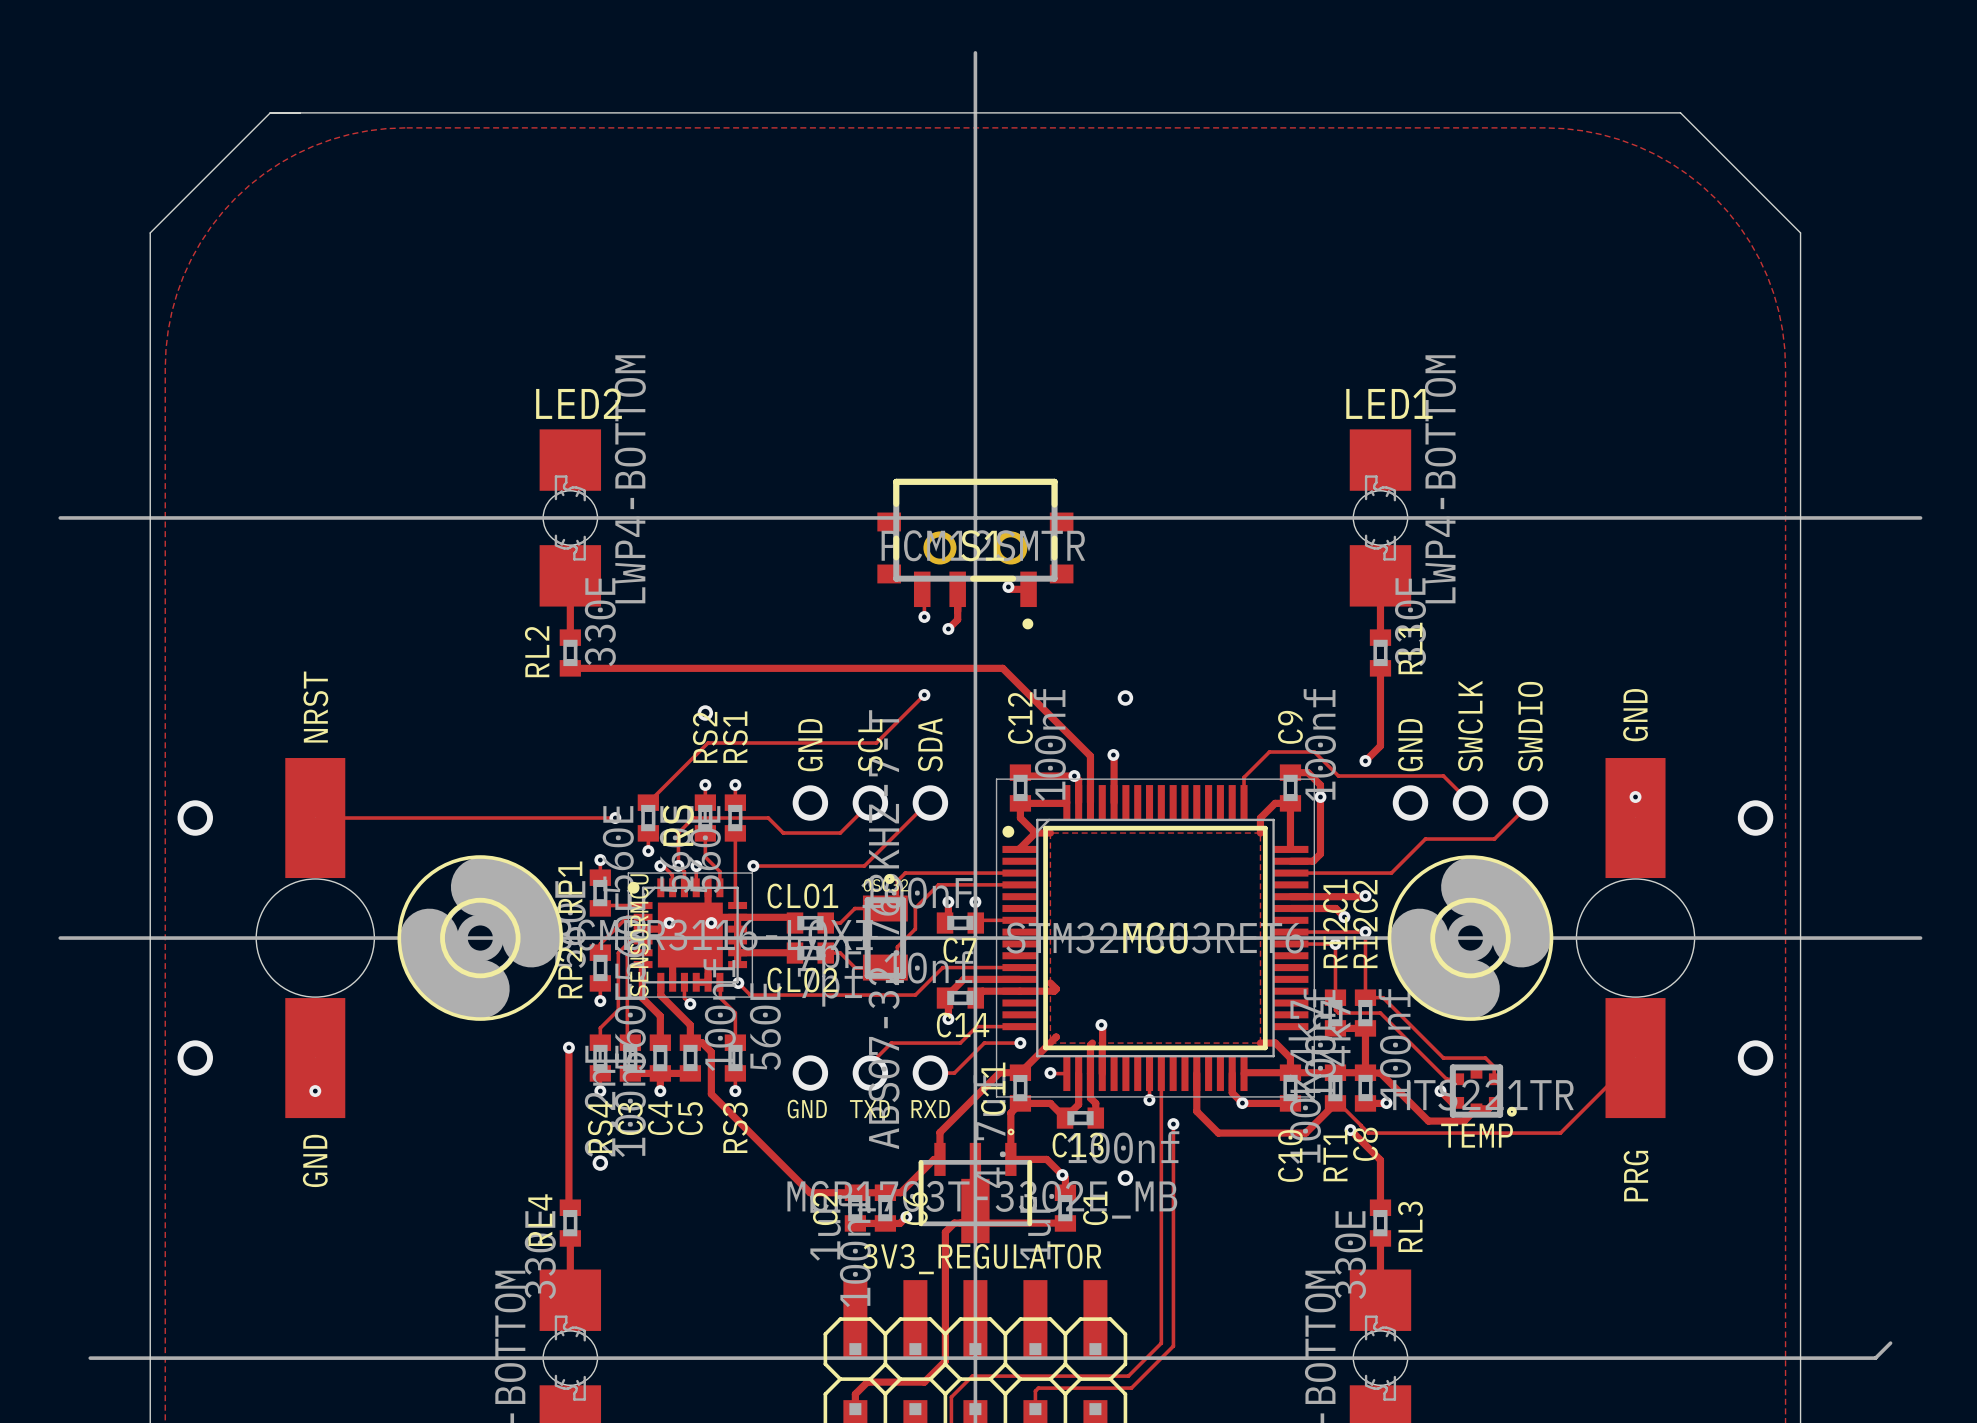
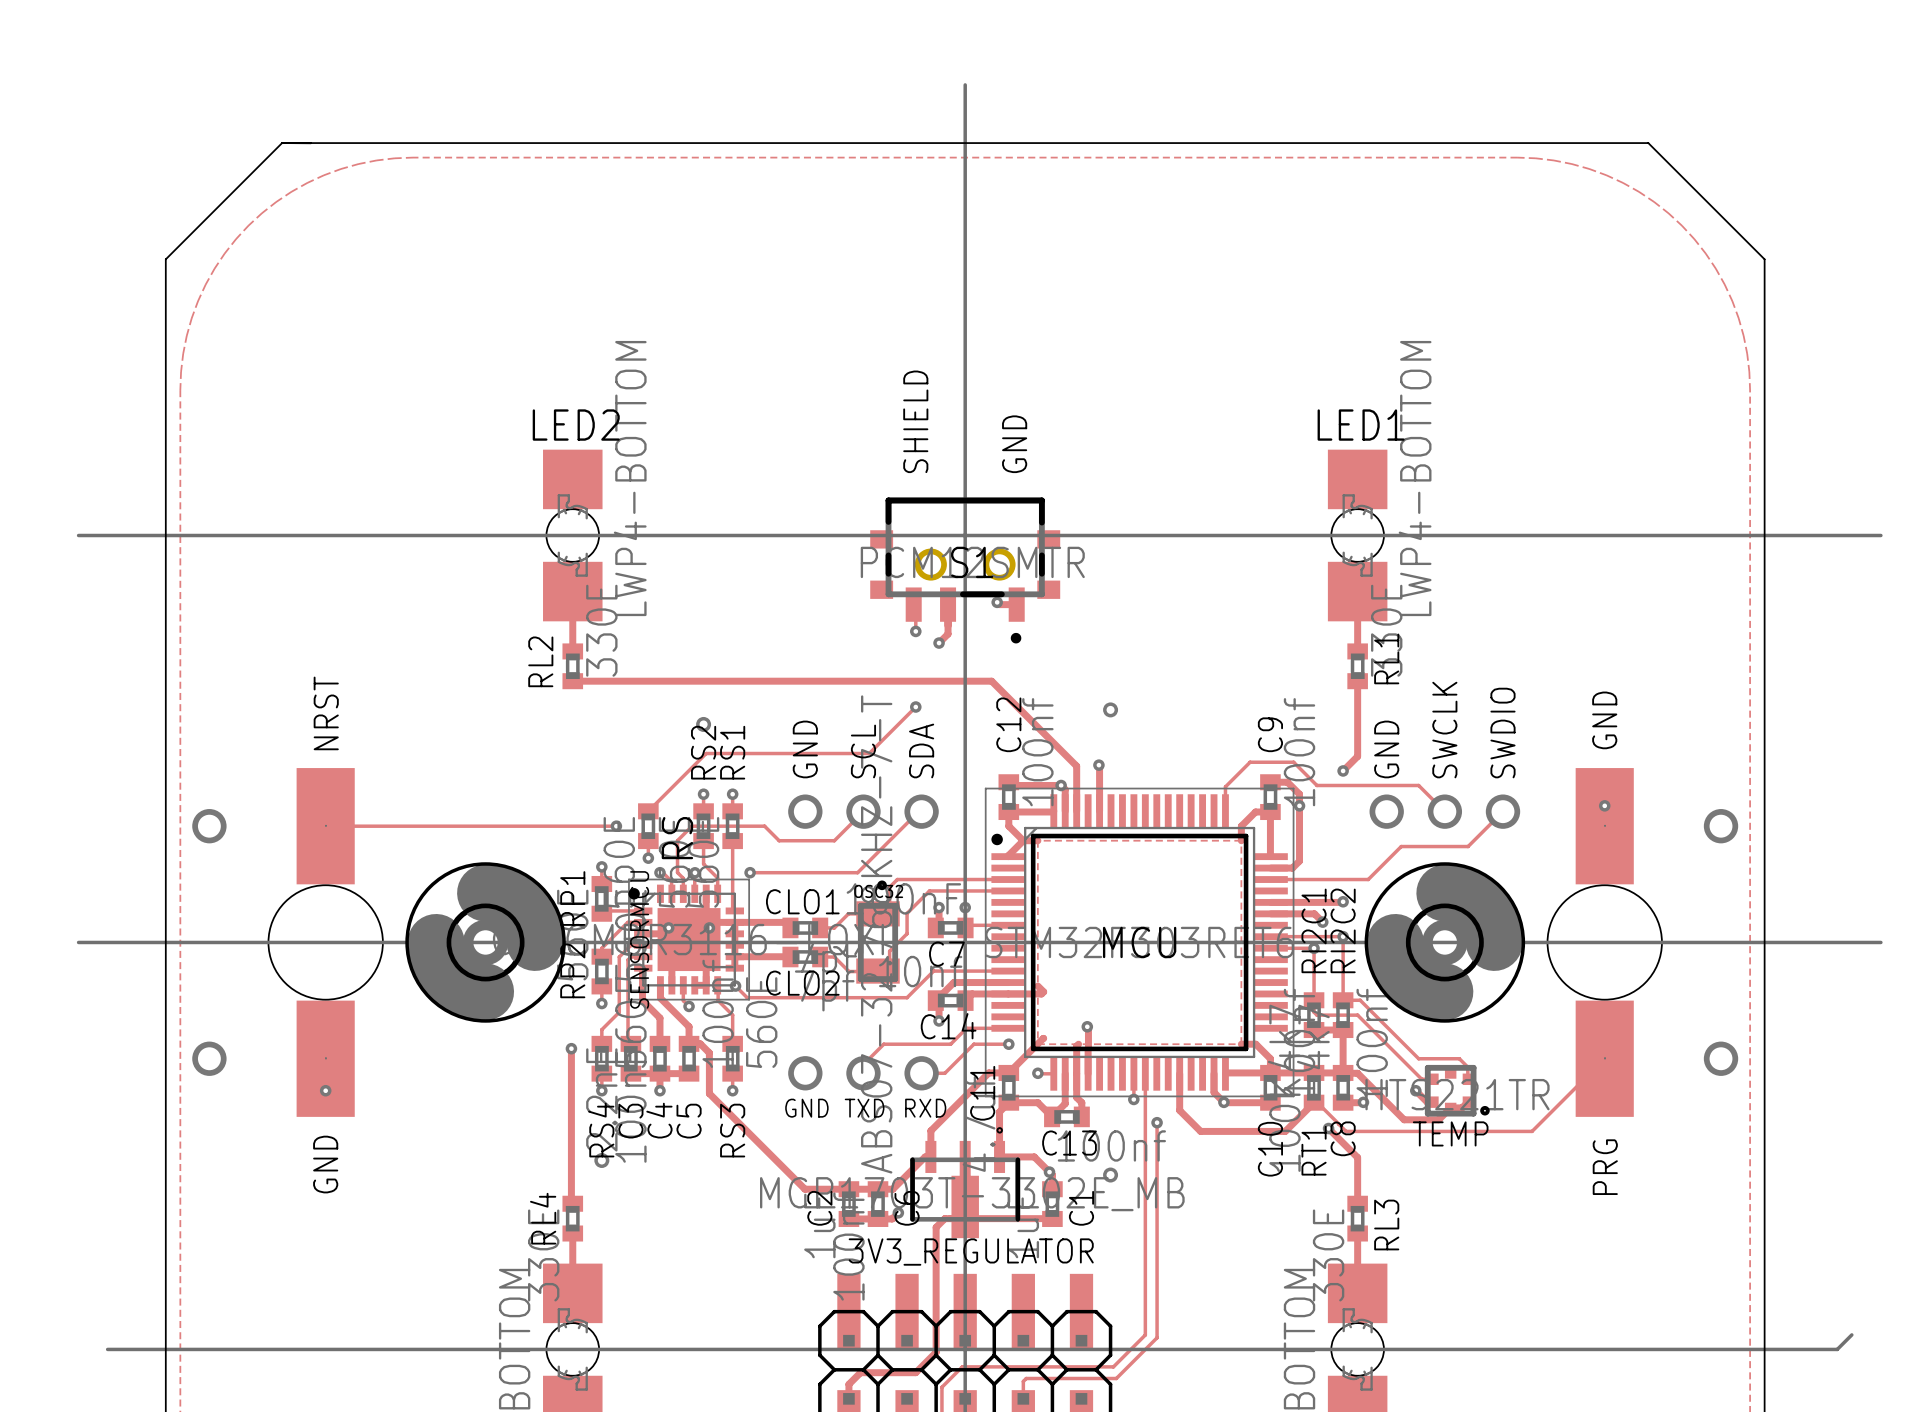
text: none -> SHIELD (915, 421)
text: none -> GND (1014, 444)
via: (678, 865) -> none

